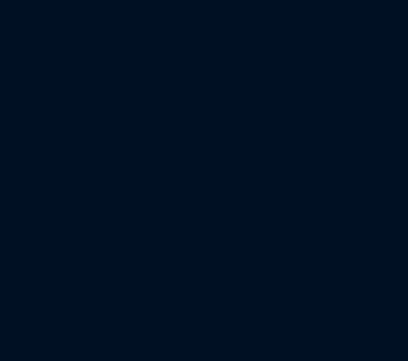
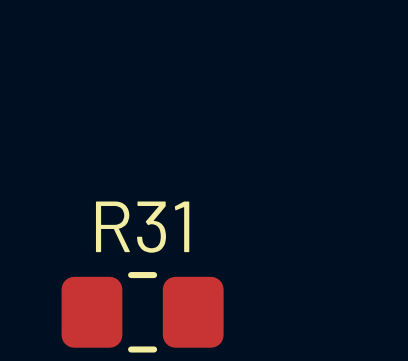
R31: none -> (142, 312)

